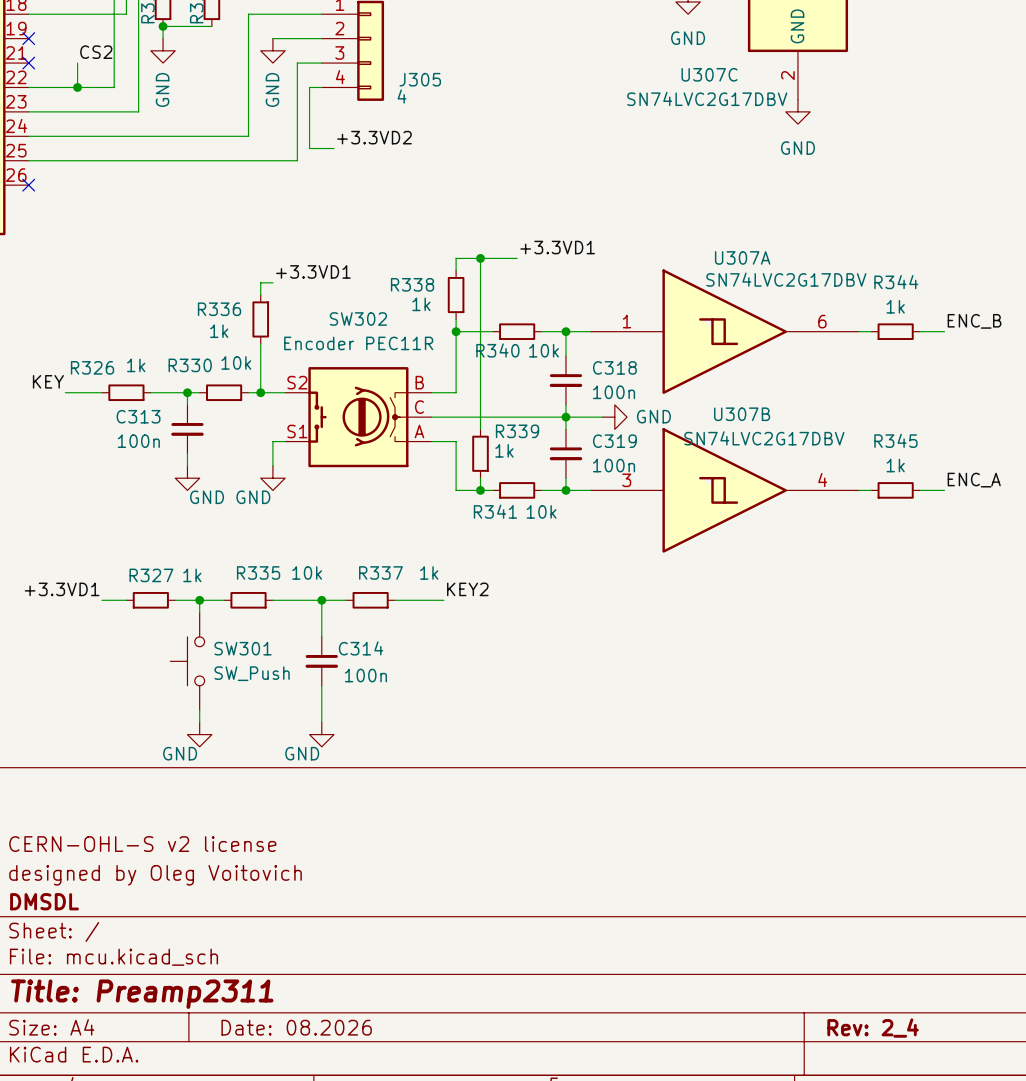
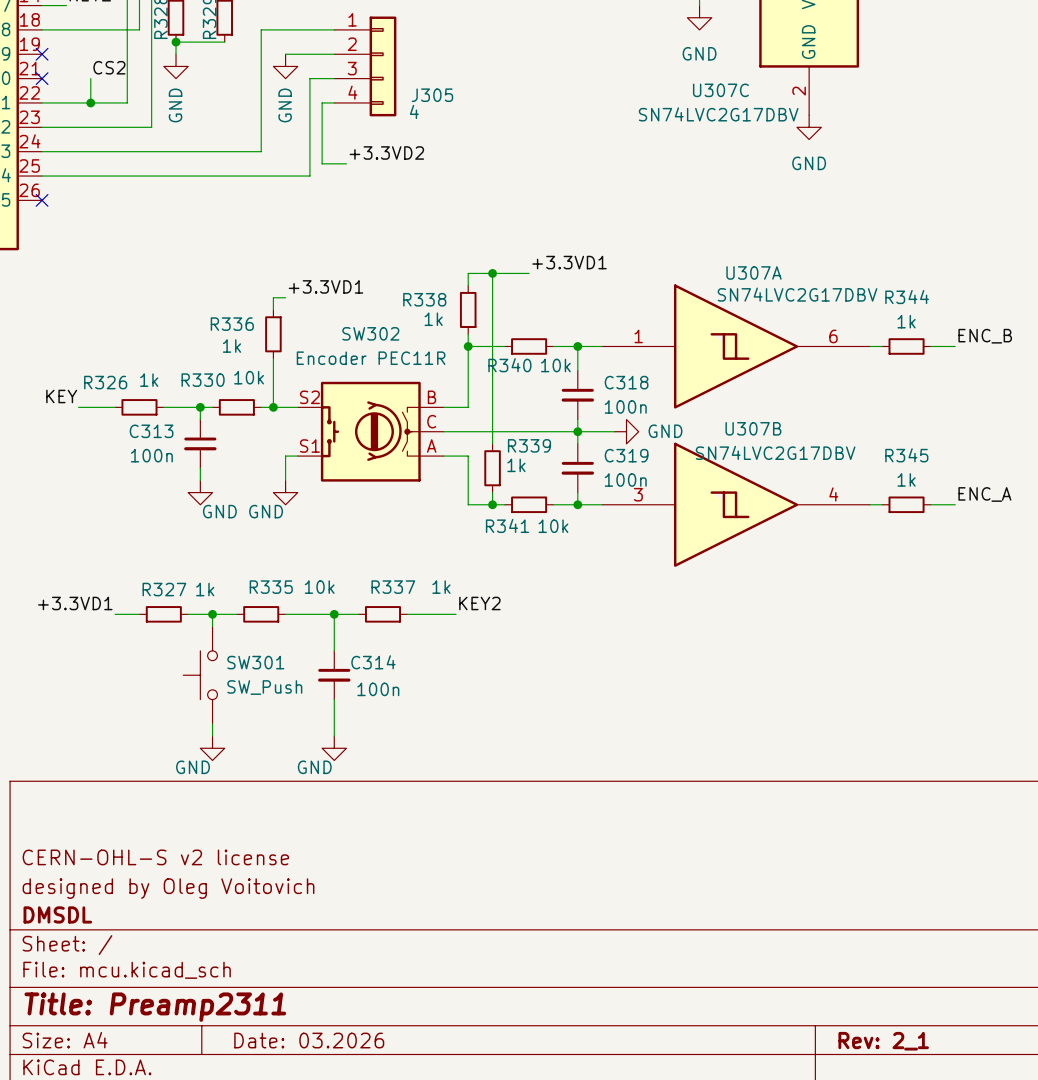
title block: Date: 08.2026 (296, 1027) -> Date: 03.2026 (309, 1040)
title block: Rev: 2_4 (873, 1028) -> Rev: 2_1 (883, 1041)

